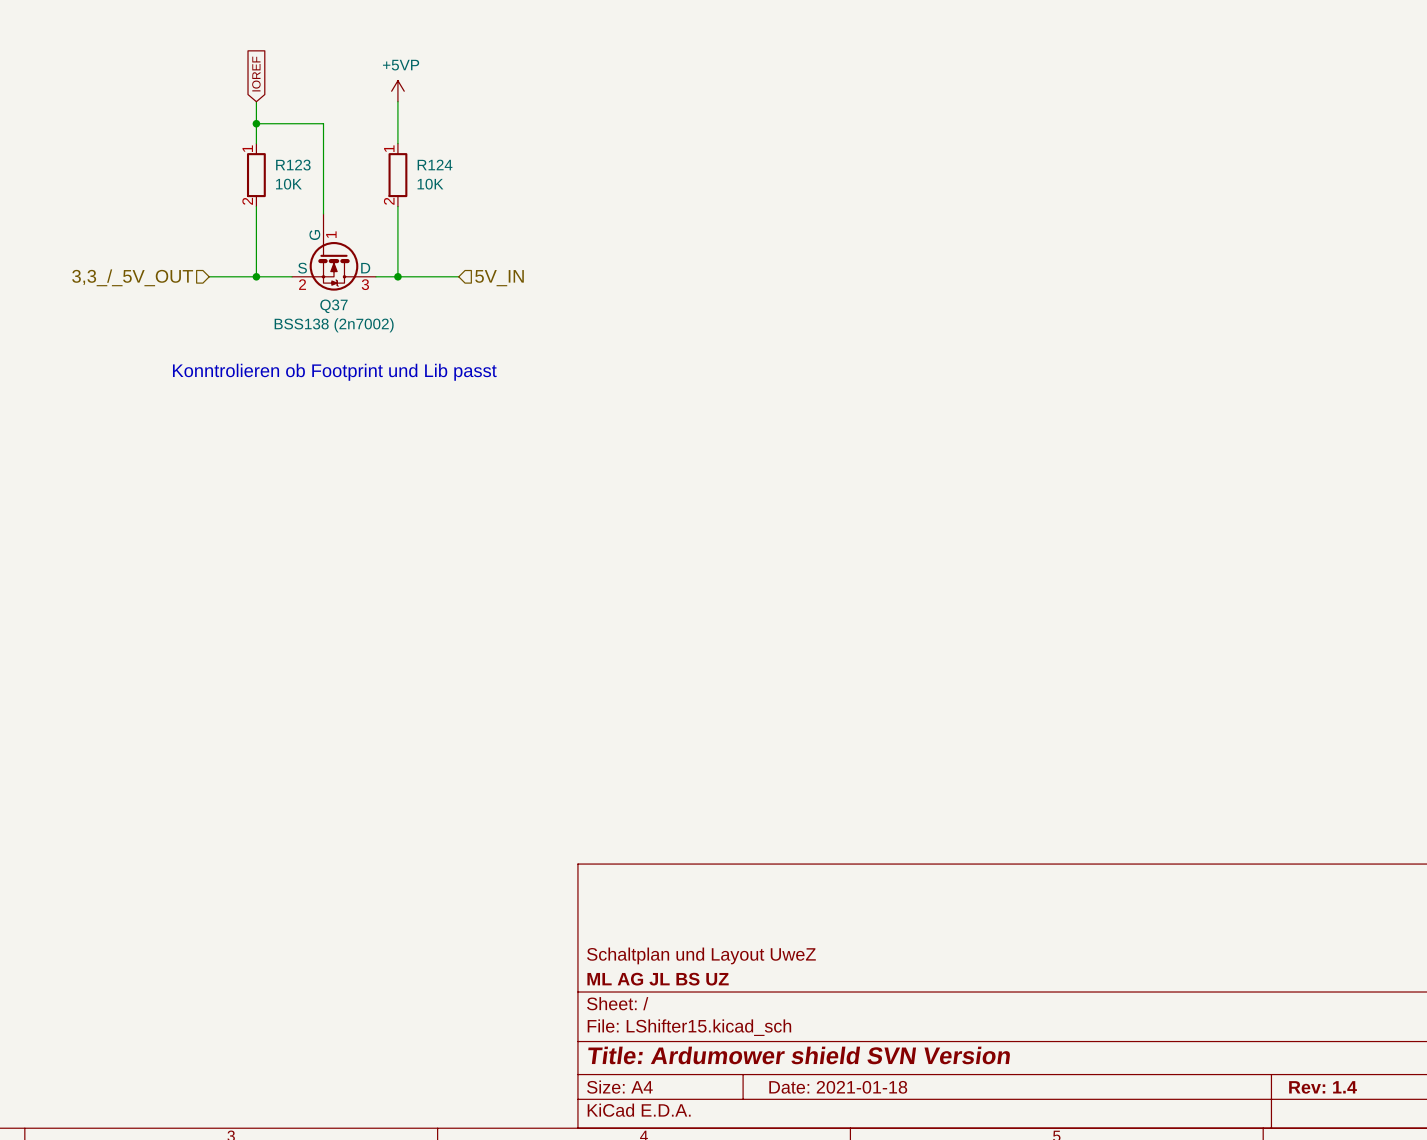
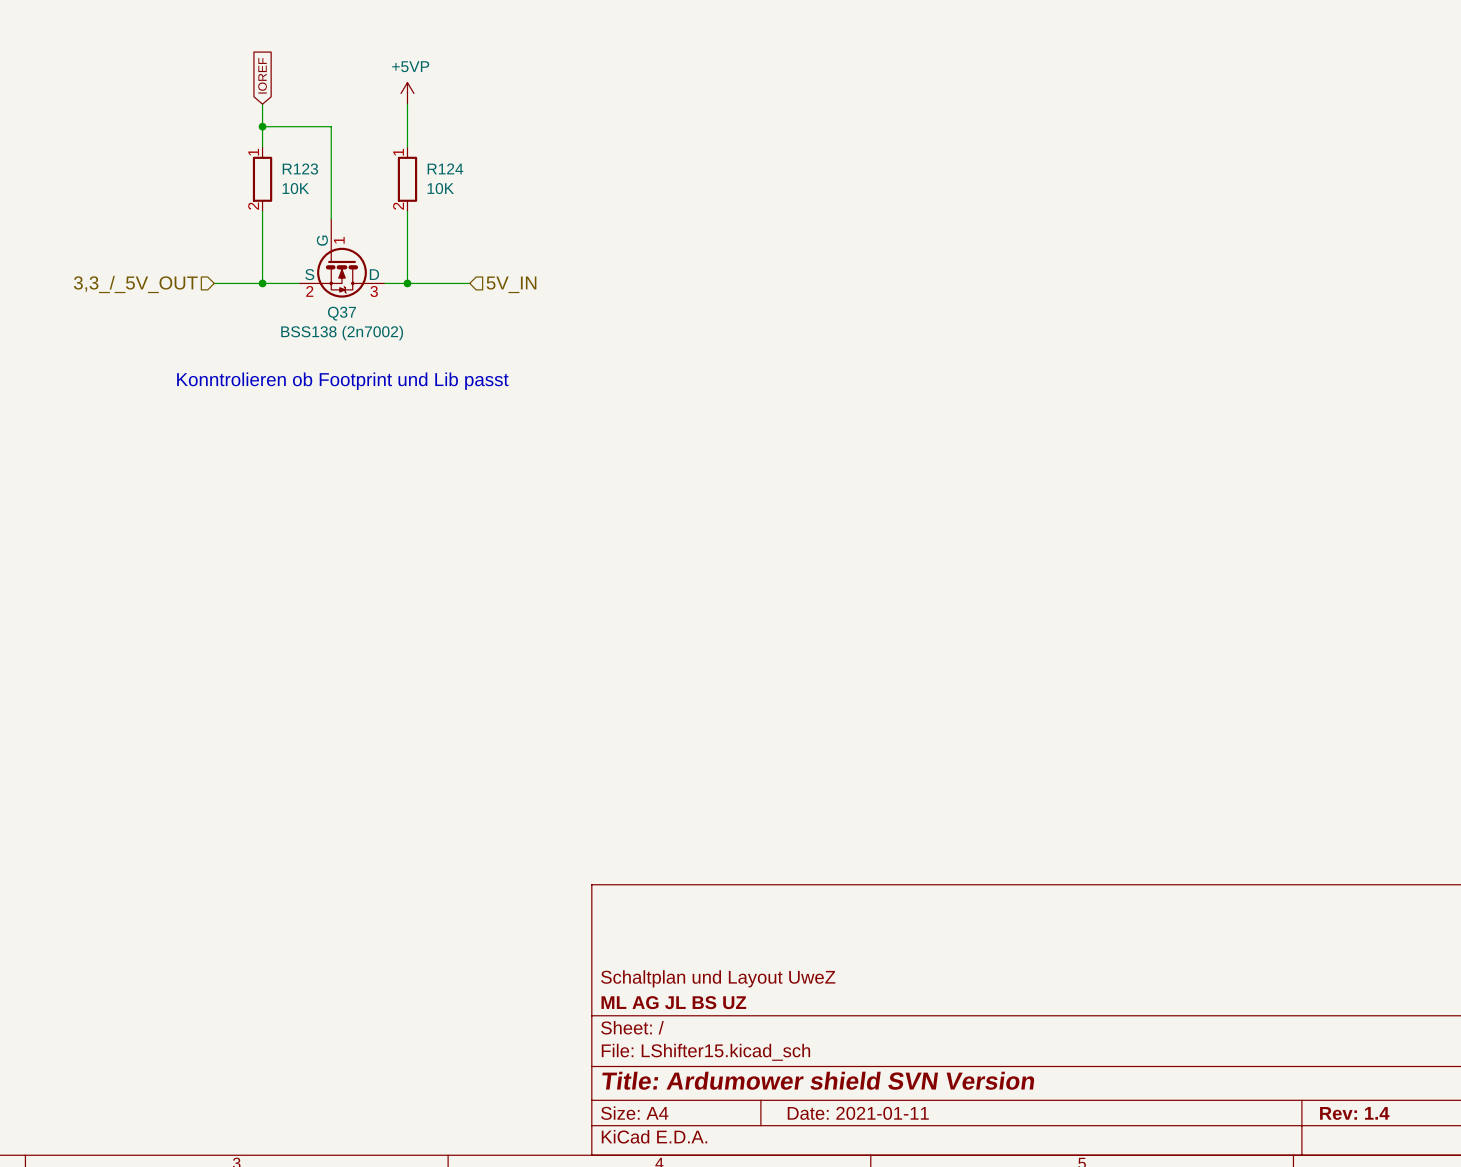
title block: Date: 2021-01-18 (838, 1087) -> Date: 2021-01-11 (858, 1113)

